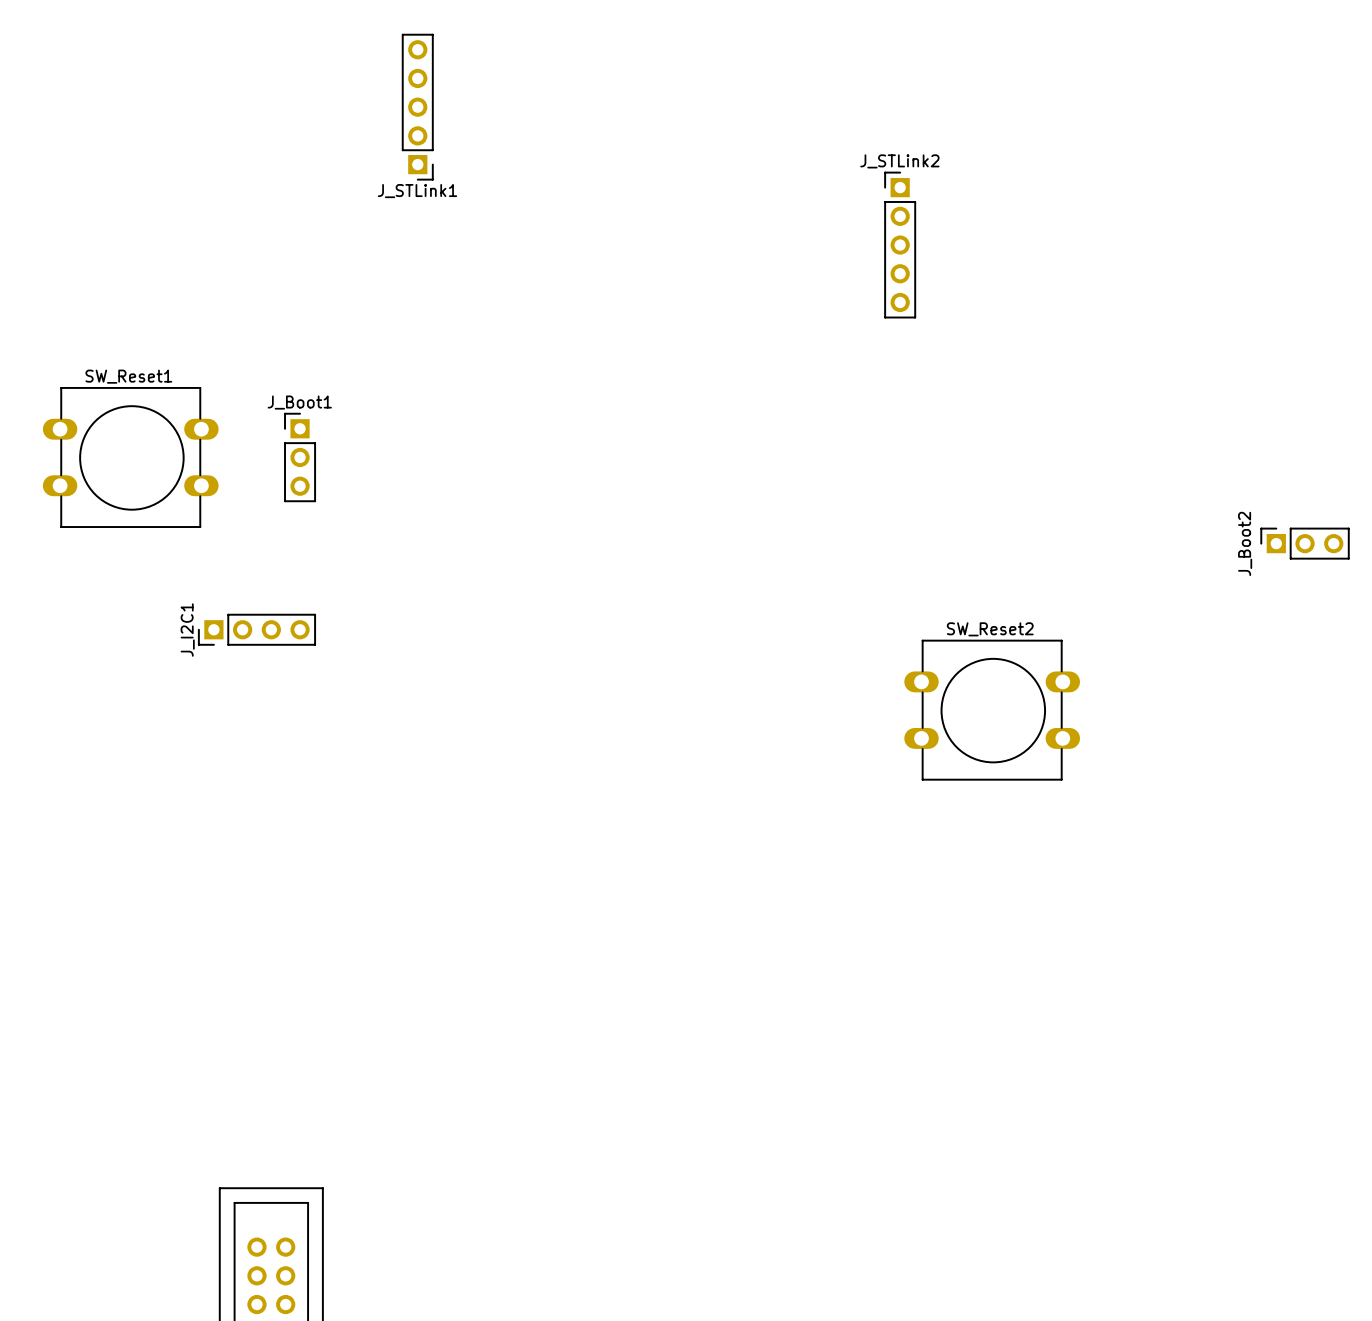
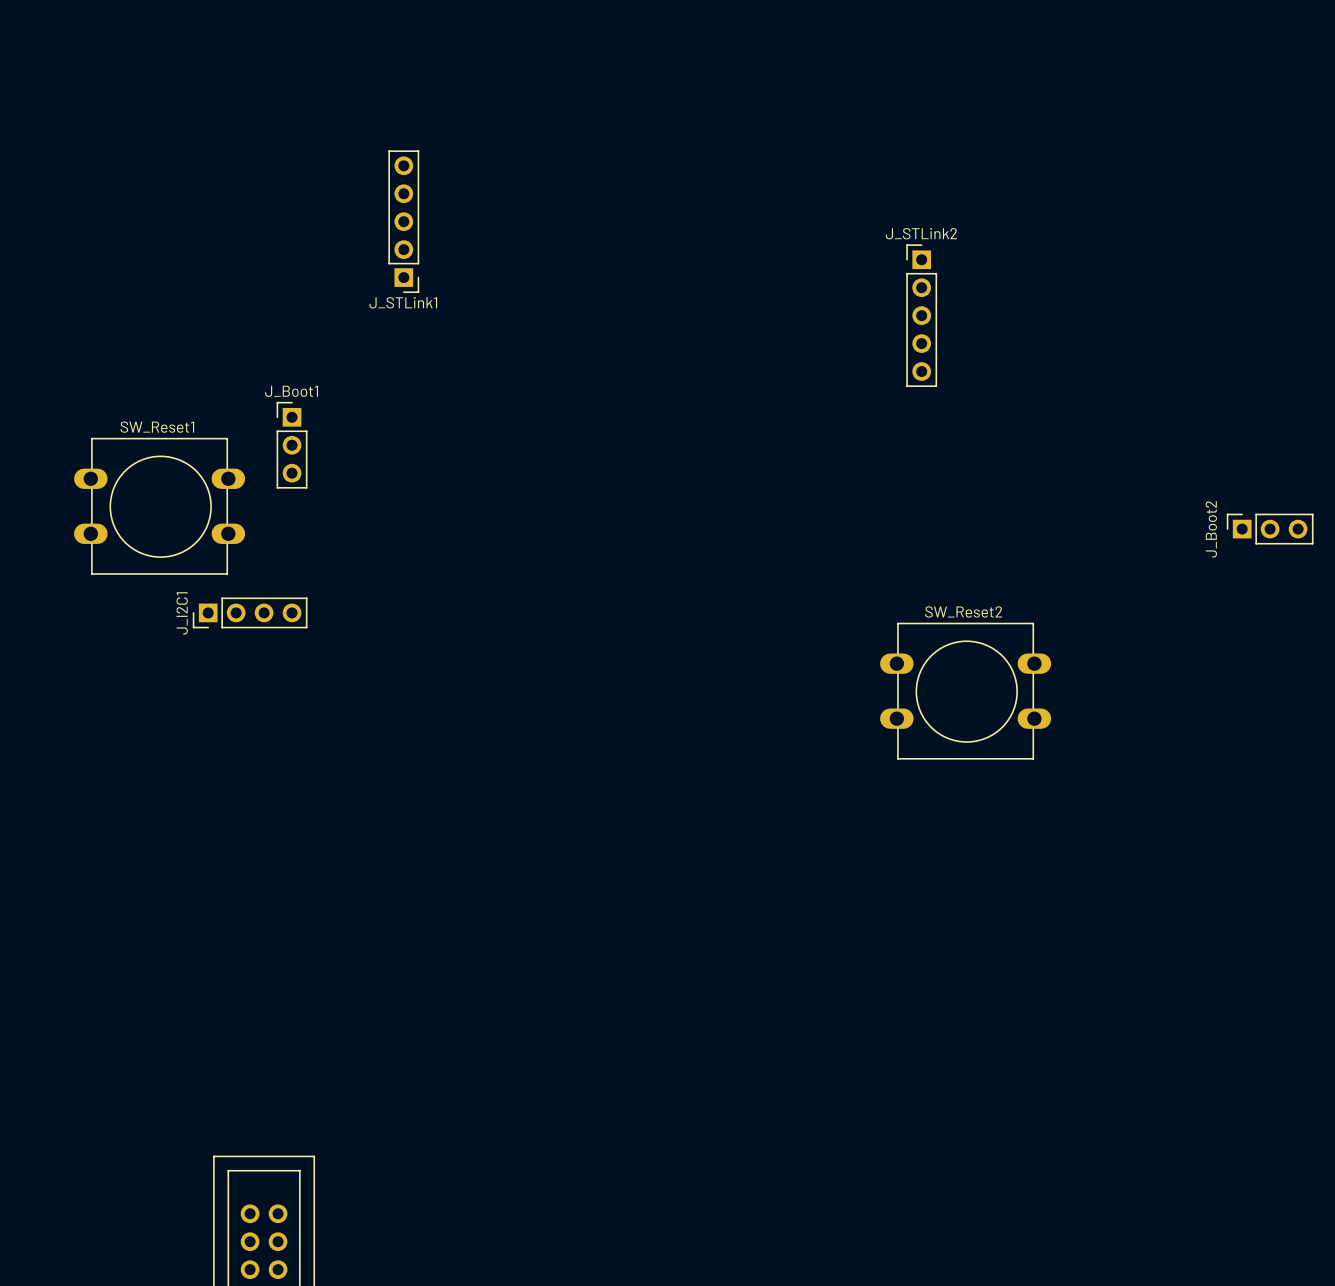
J_STLink1 position: (417, 107) -> (403, 221)
J_STLink2 position: (900, 245) -> (921, 315)
SW_Reset1 position: (130, 457) -> (159, 506)

